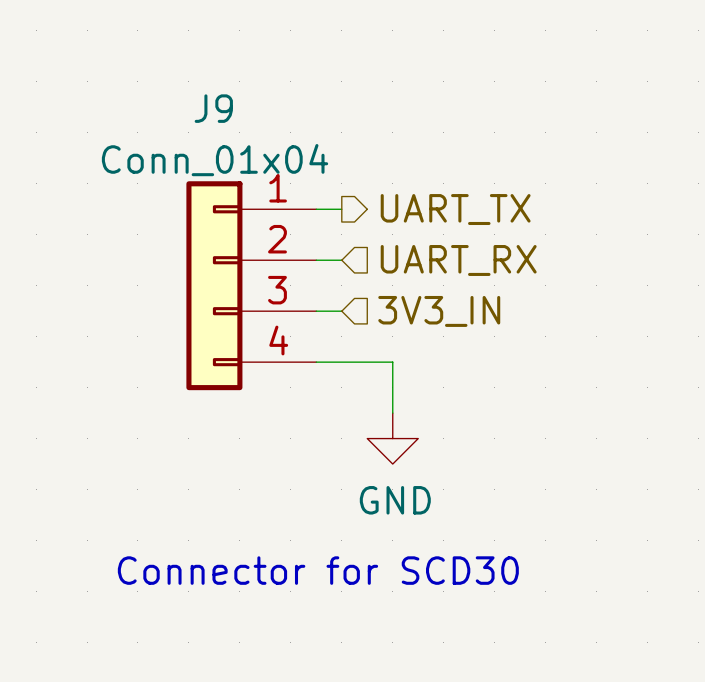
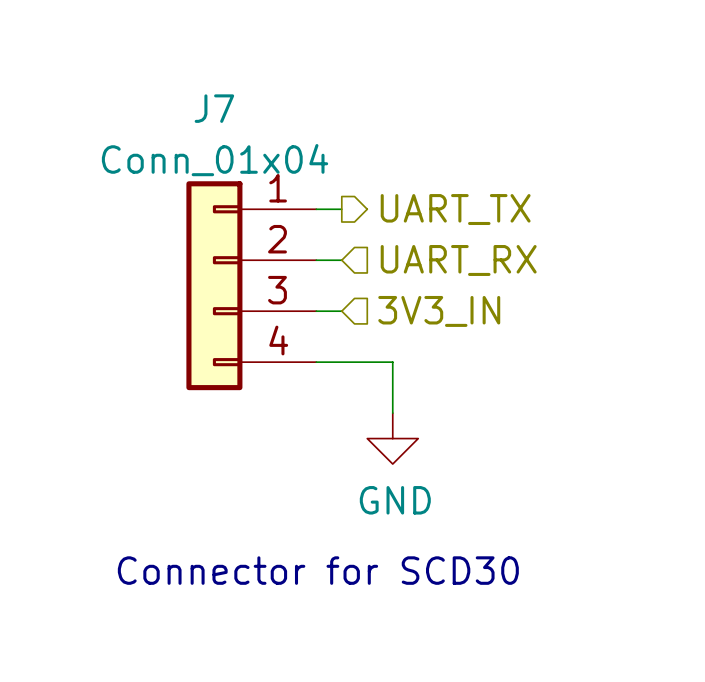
J9 name: J9 (213, 108) -> J7 (214, 108)

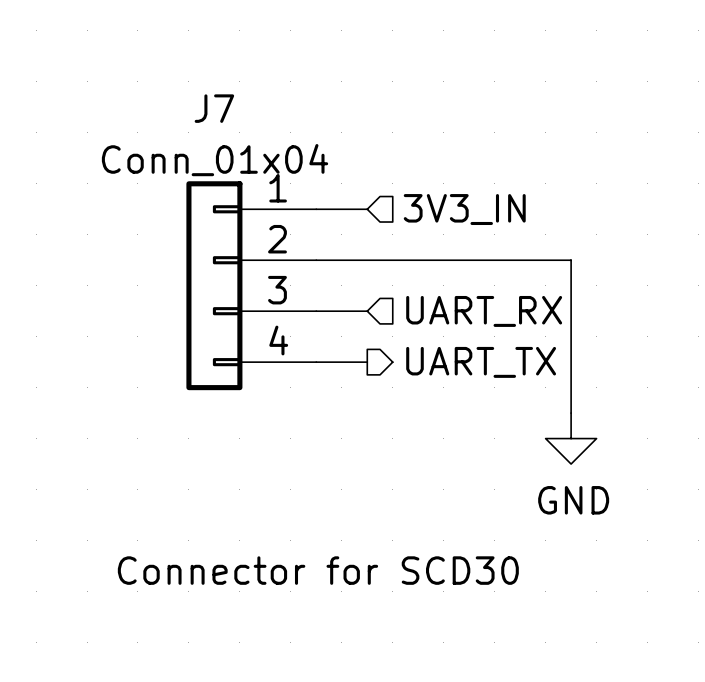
wire: none -> (341, 209) (367, 209)
hierarchical label position: UART_TX (455, 209) -> UART_TX (481, 362)
wire: none -> (341, 260) (571, 260) (571, 413)
hierarchical label position: UART_RX (458, 260) -> UART_RX (484, 311)
wire: none -> (341, 311) (367, 311)
hierarchical label position: 3V3_IN (439, 311) -> 3V3_IN (464, 209)
wire: (367, 362) (392, 362) (392, 413) -> none
power symbol position: GND (392, 438) -> GND (571, 438)

